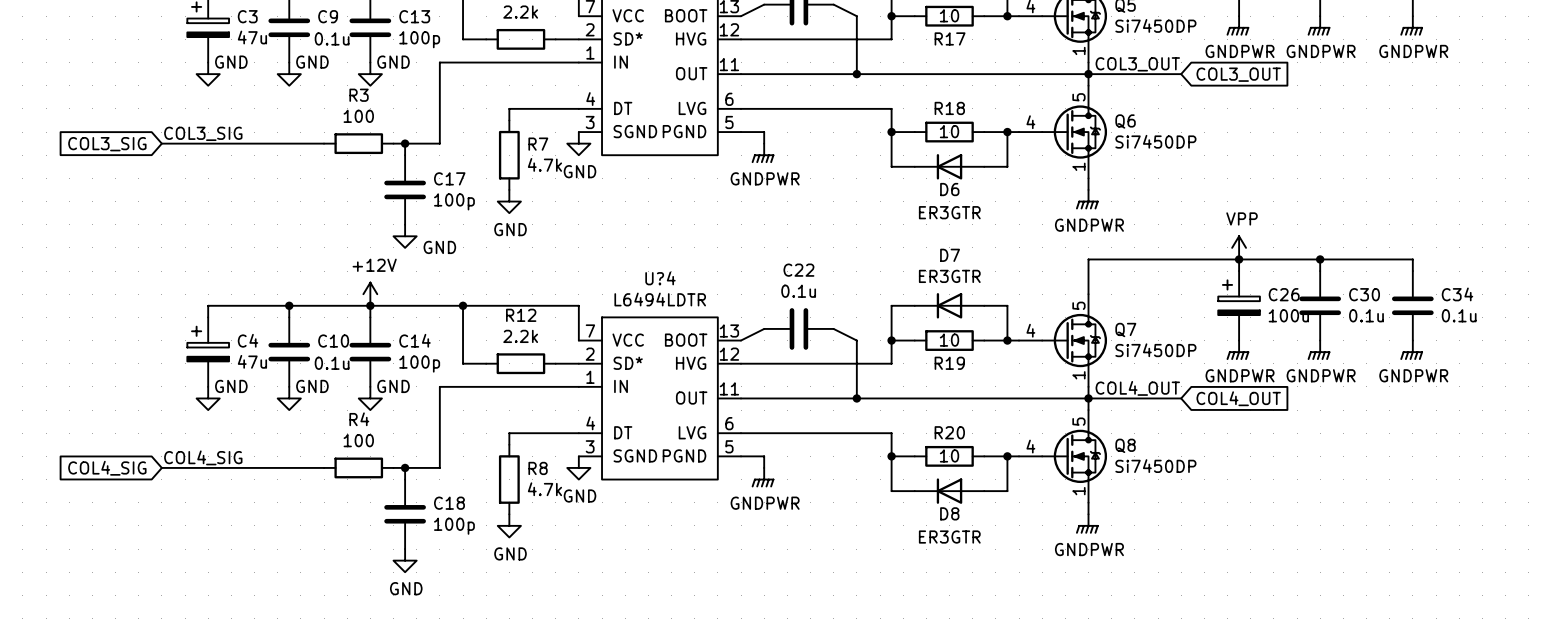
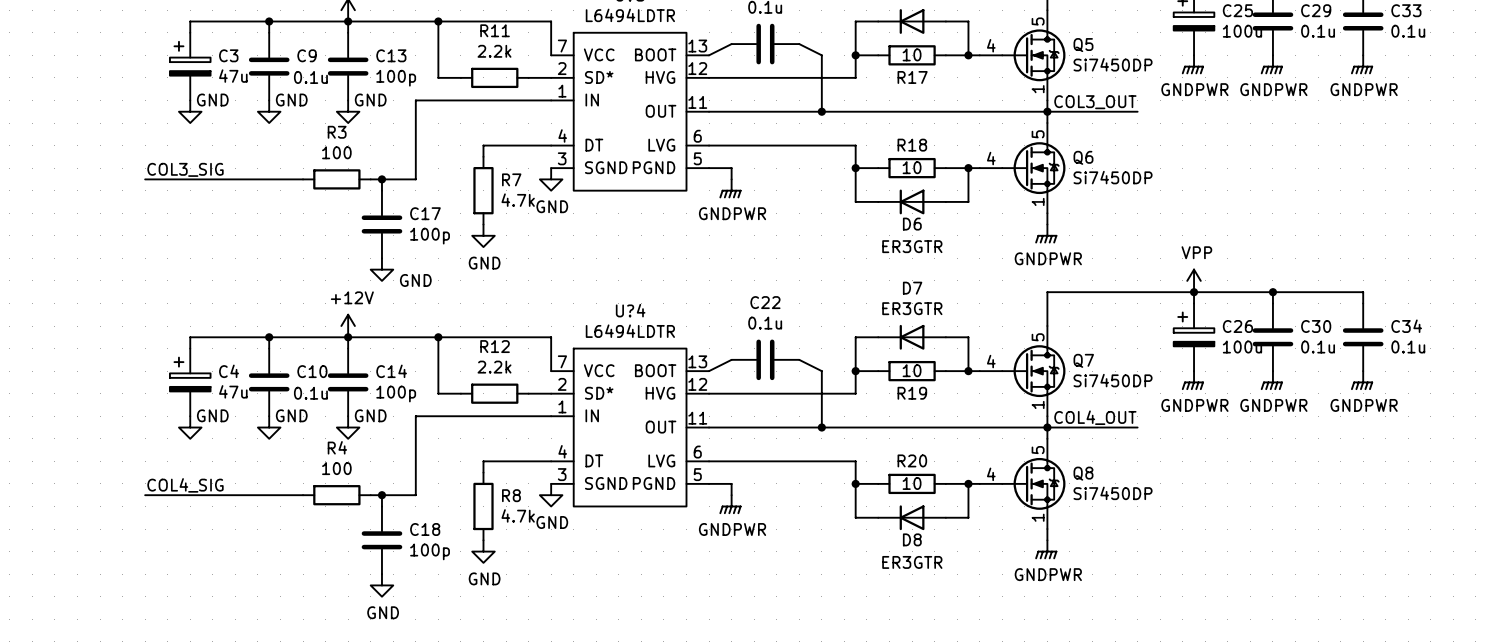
global label: COL3_OUT (1238, 74) -> none
global label: COL3_SIG (107, 144) -> none
global label: COL4_OUT (1238, 398) -> none
global label: COL4_SIG (107, 468) -> none

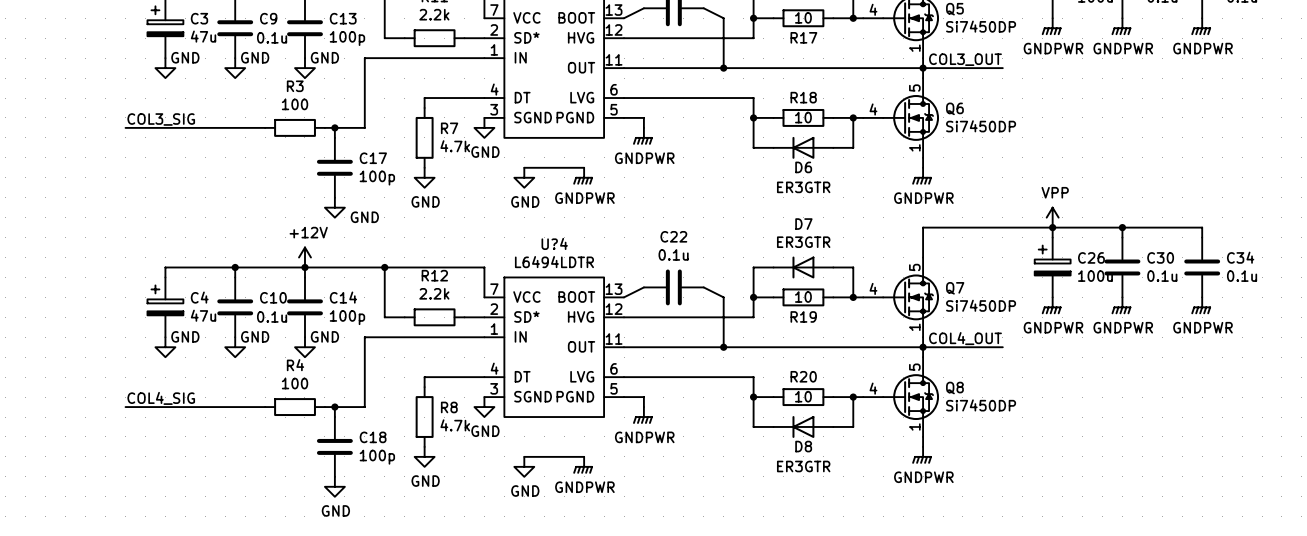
wire: none -> (524, 167) (584, 167)
power symbol: none -> GNDPWR (583, 176)
power symbol: none -> GND (524, 177)
wire: none -> (524, 456) (584, 456)
power symbol: none -> GNDPWR (583, 465)
power symbol: none -> GND (524, 466)

